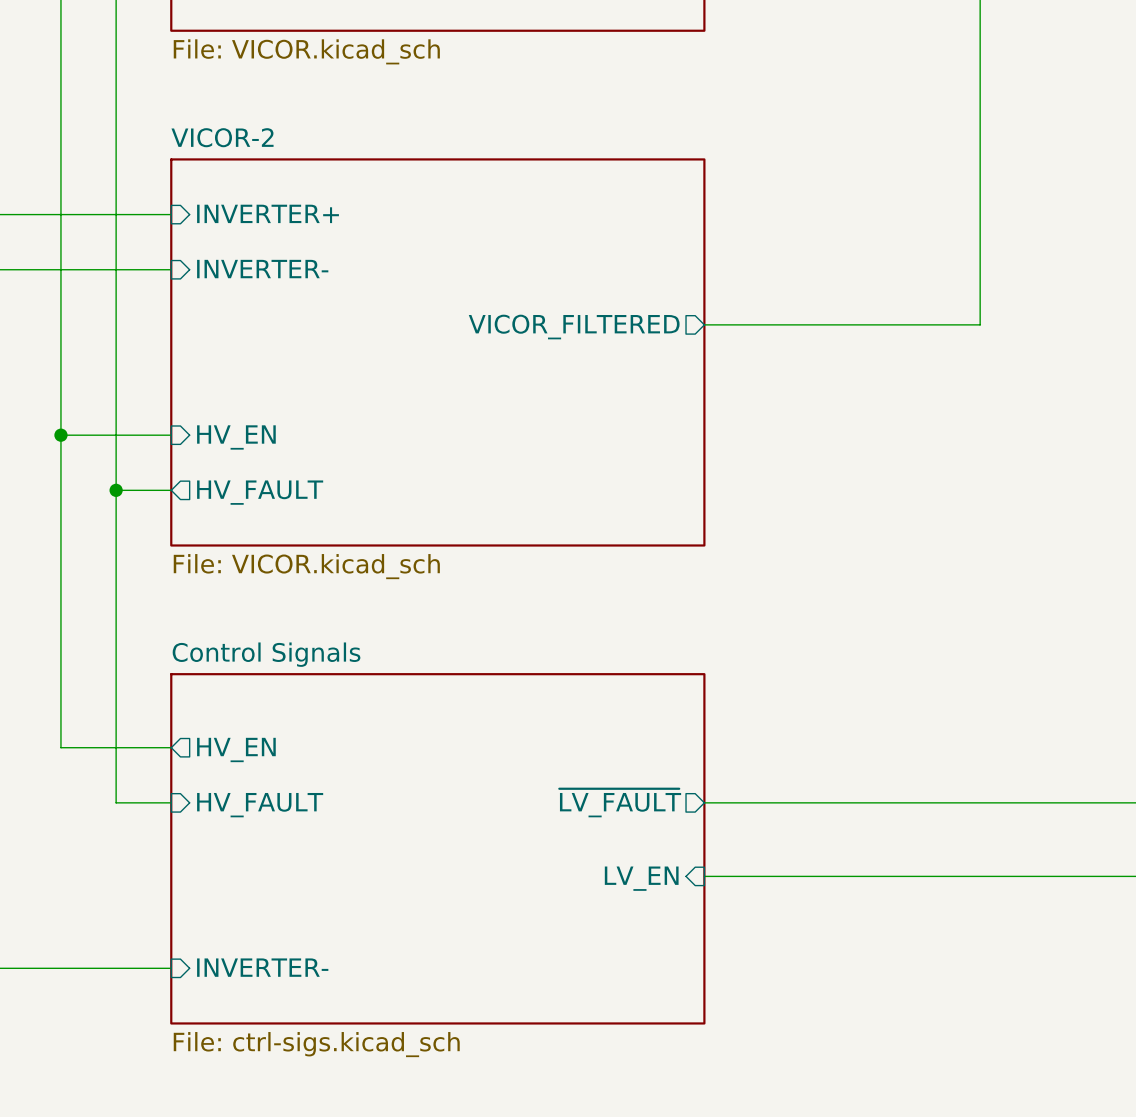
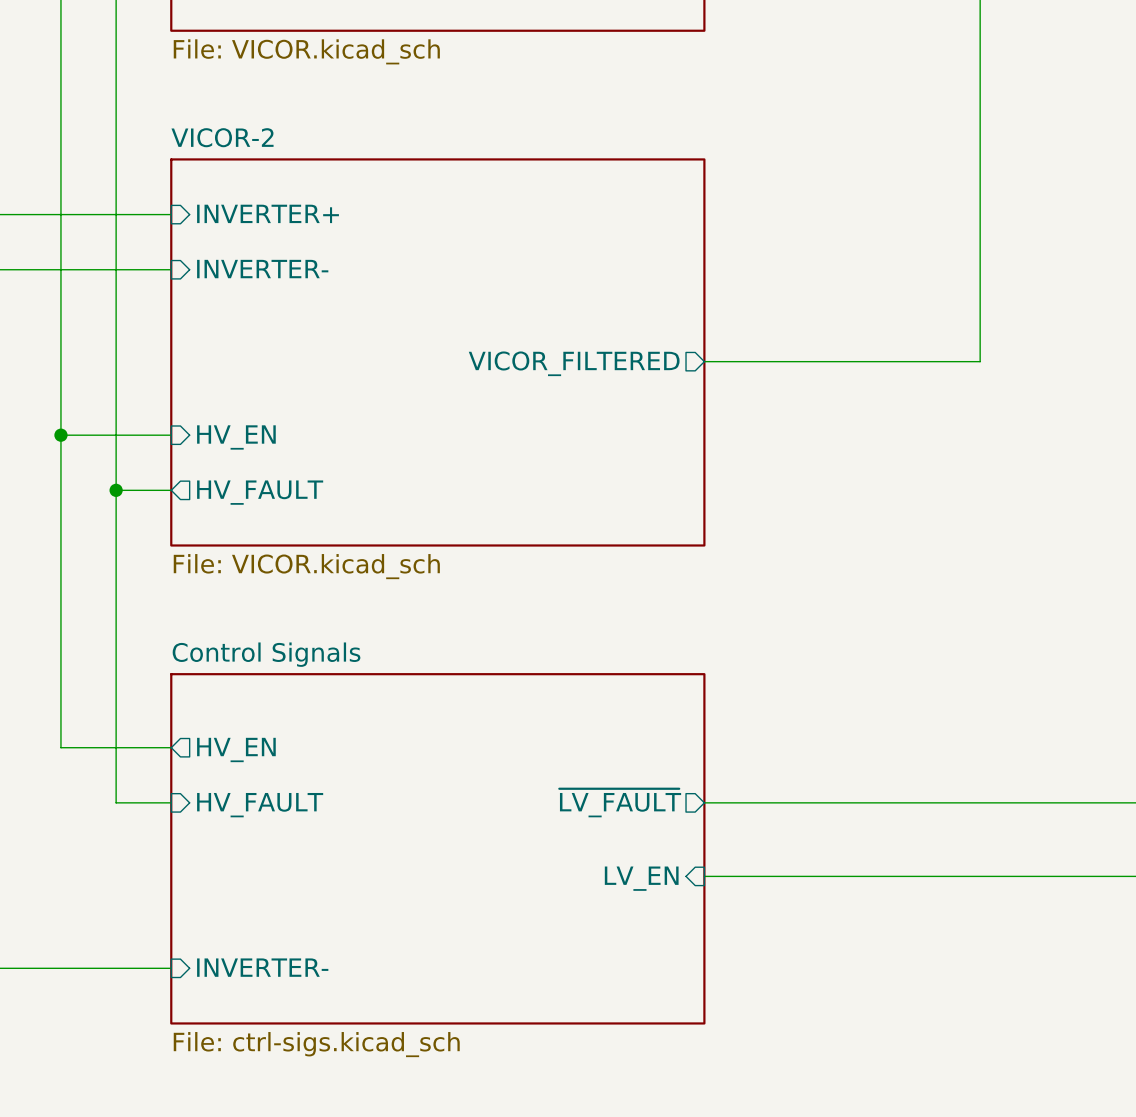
wire: (704, 324) (980, 324) -> (704, 361) (980, 361) (980, 324)
sheet pin position: VICOR_FILTERED (574, 327) -> VICOR_FILTERED (574, 363)

